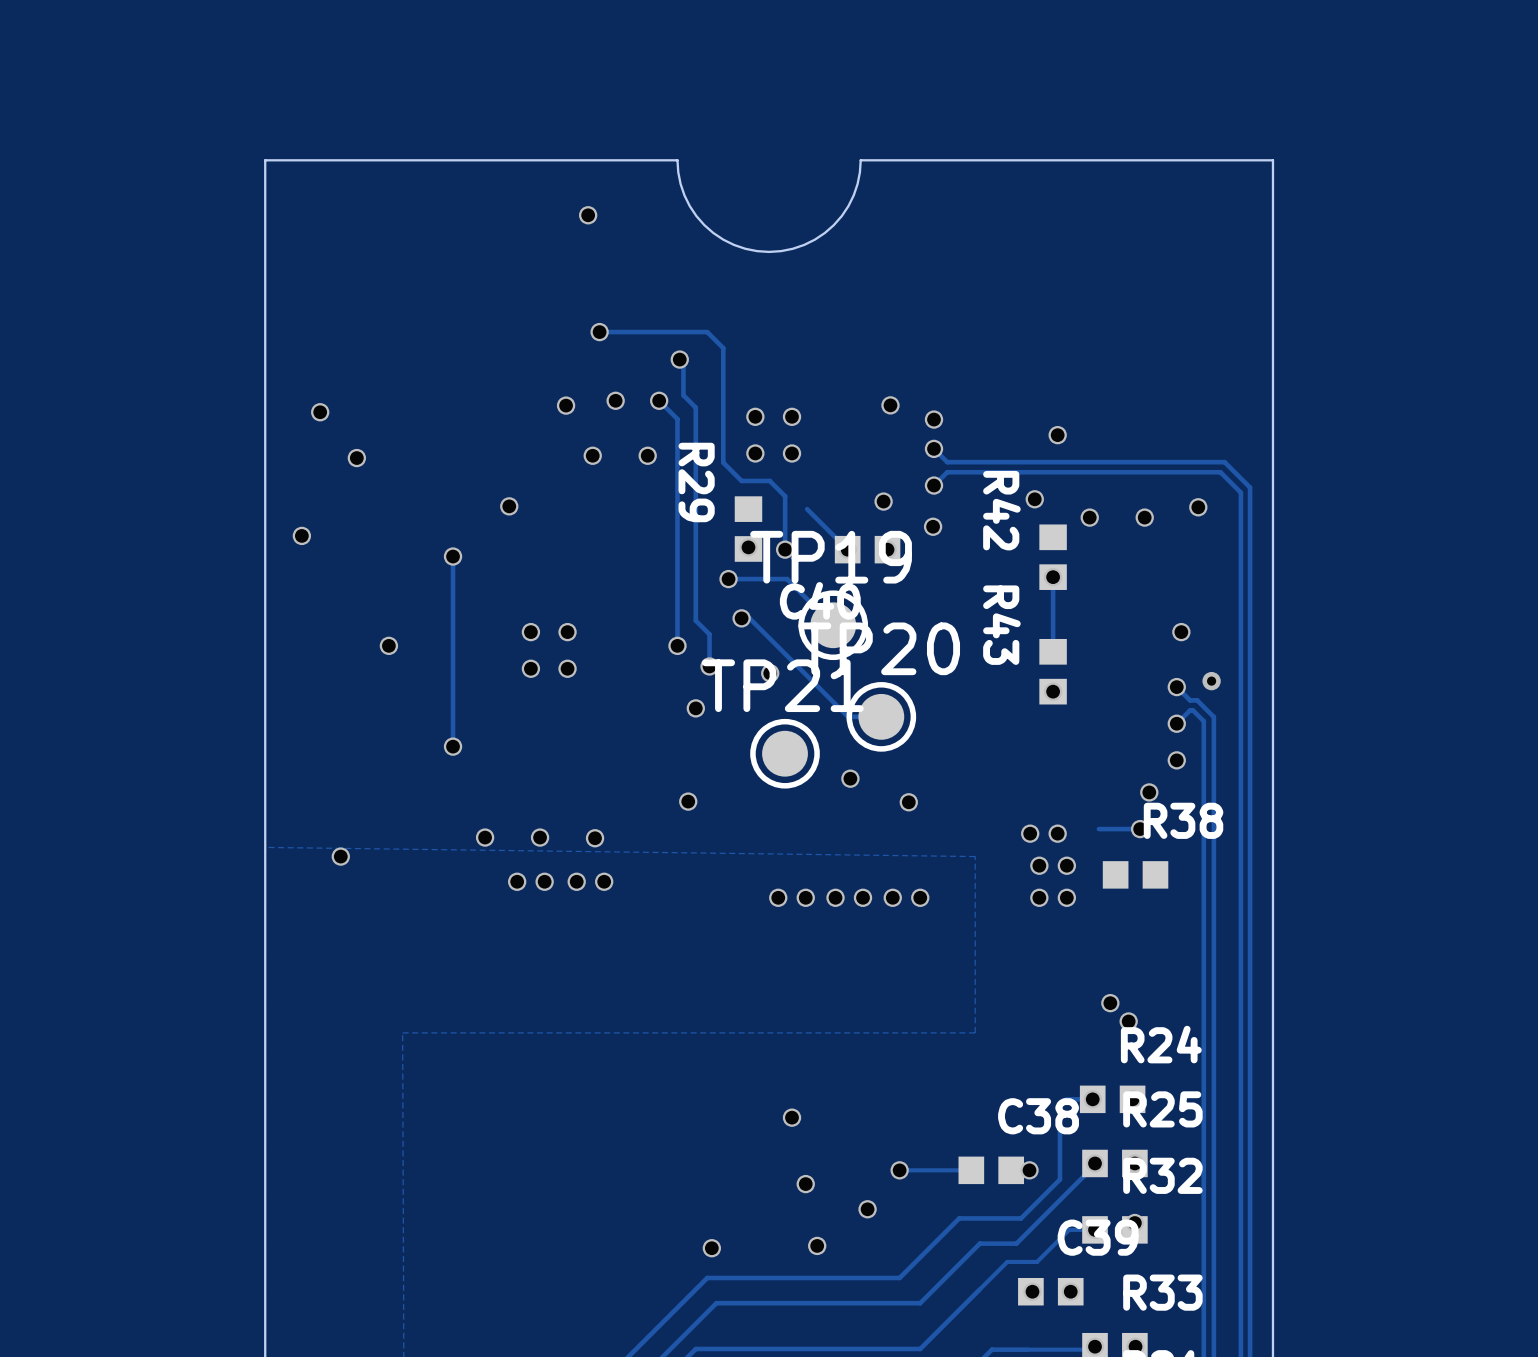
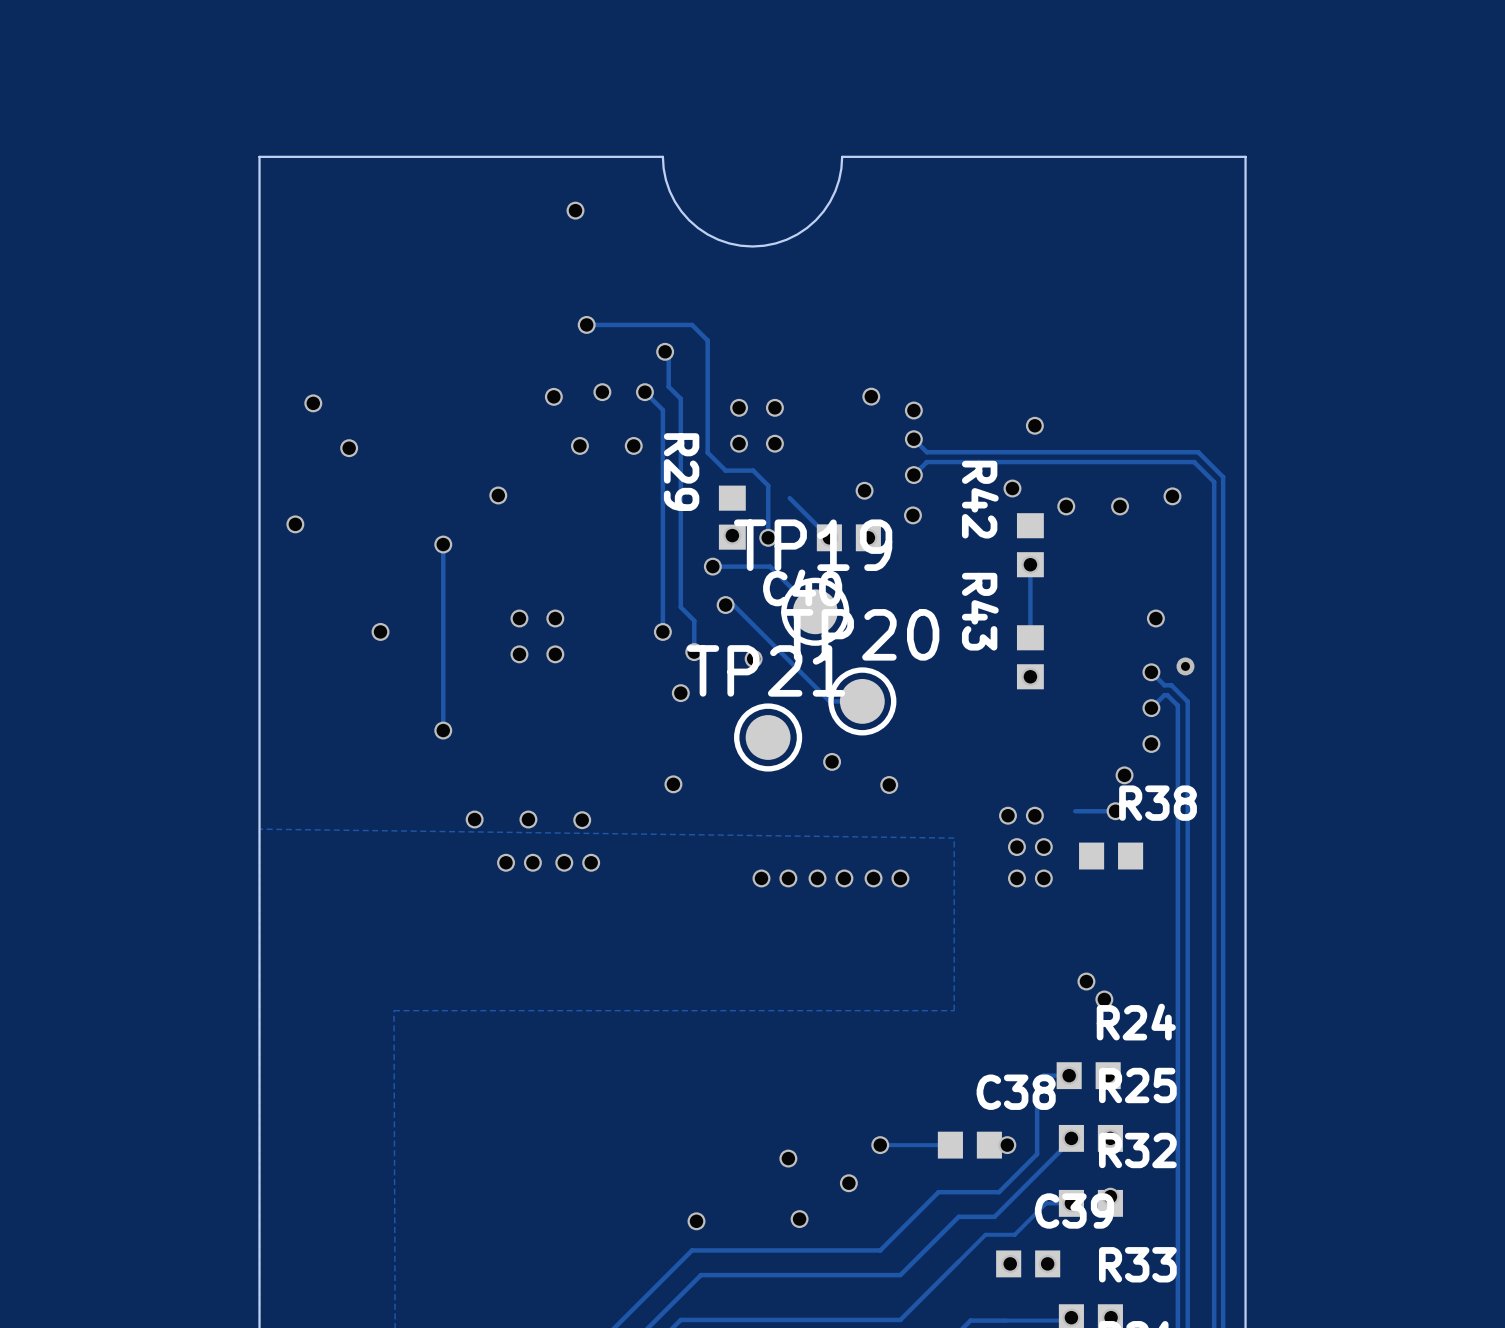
via: (340, 856) -> none
via: (792, 1117) -> none

